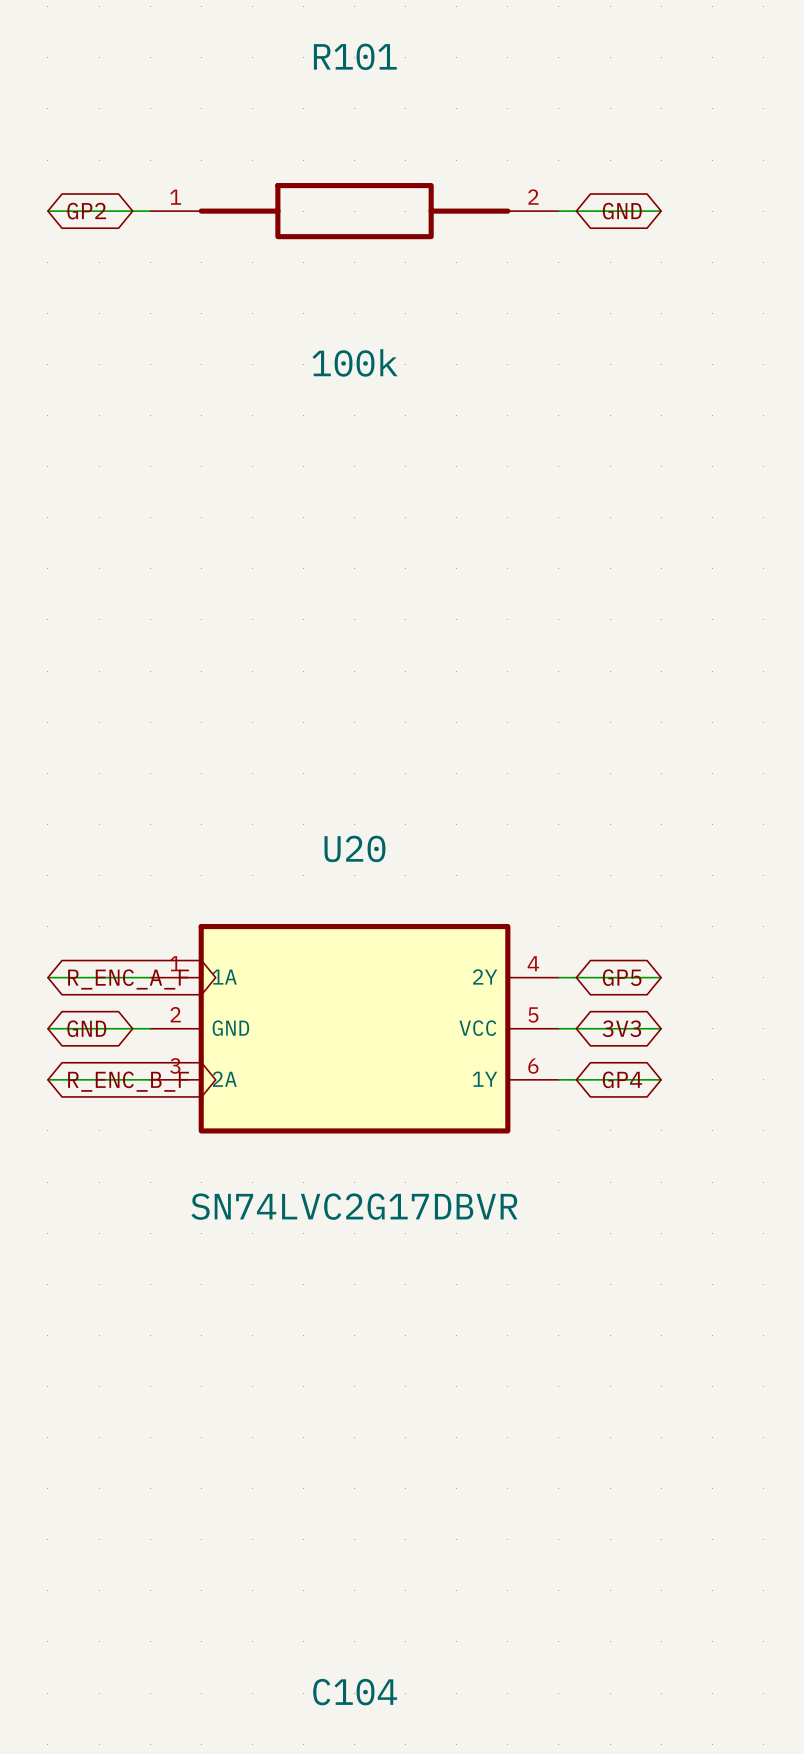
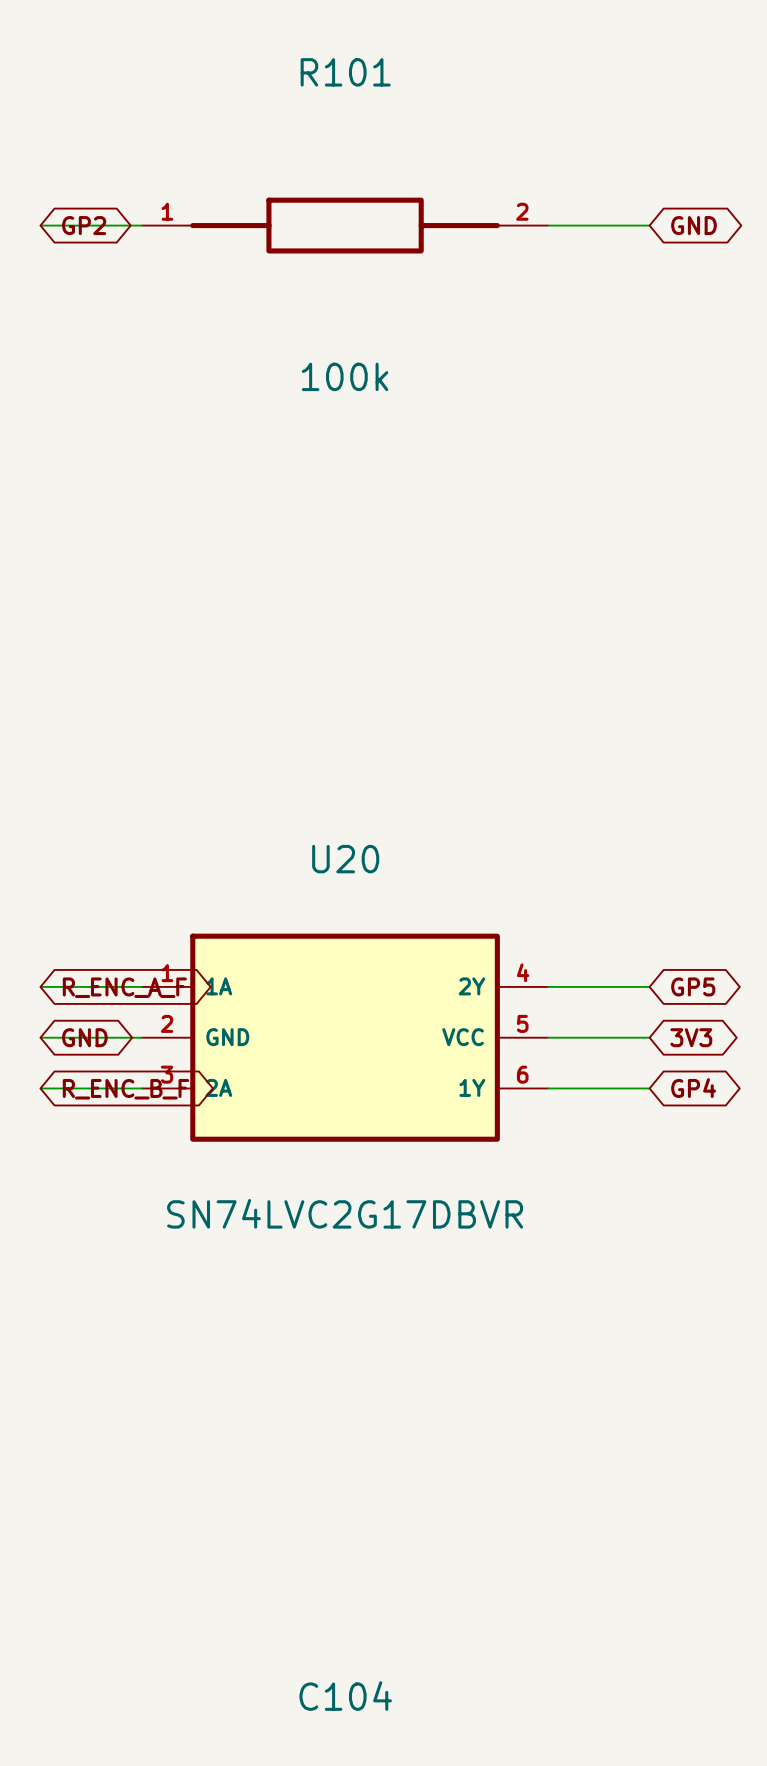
global label rotation: 0° (622, 211) -> 180° (693, 225)
global label rotation: 0° (622, 977) -> 180° (693, 986)
global label rotation: 0° (621, 1028) -> 180° (691, 1037)
global label position: 3V3 (621, 1028) -> 3V3 (691, 1037)
global label rotation: 0° (622, 1079) -> 180° (693, 1088)

